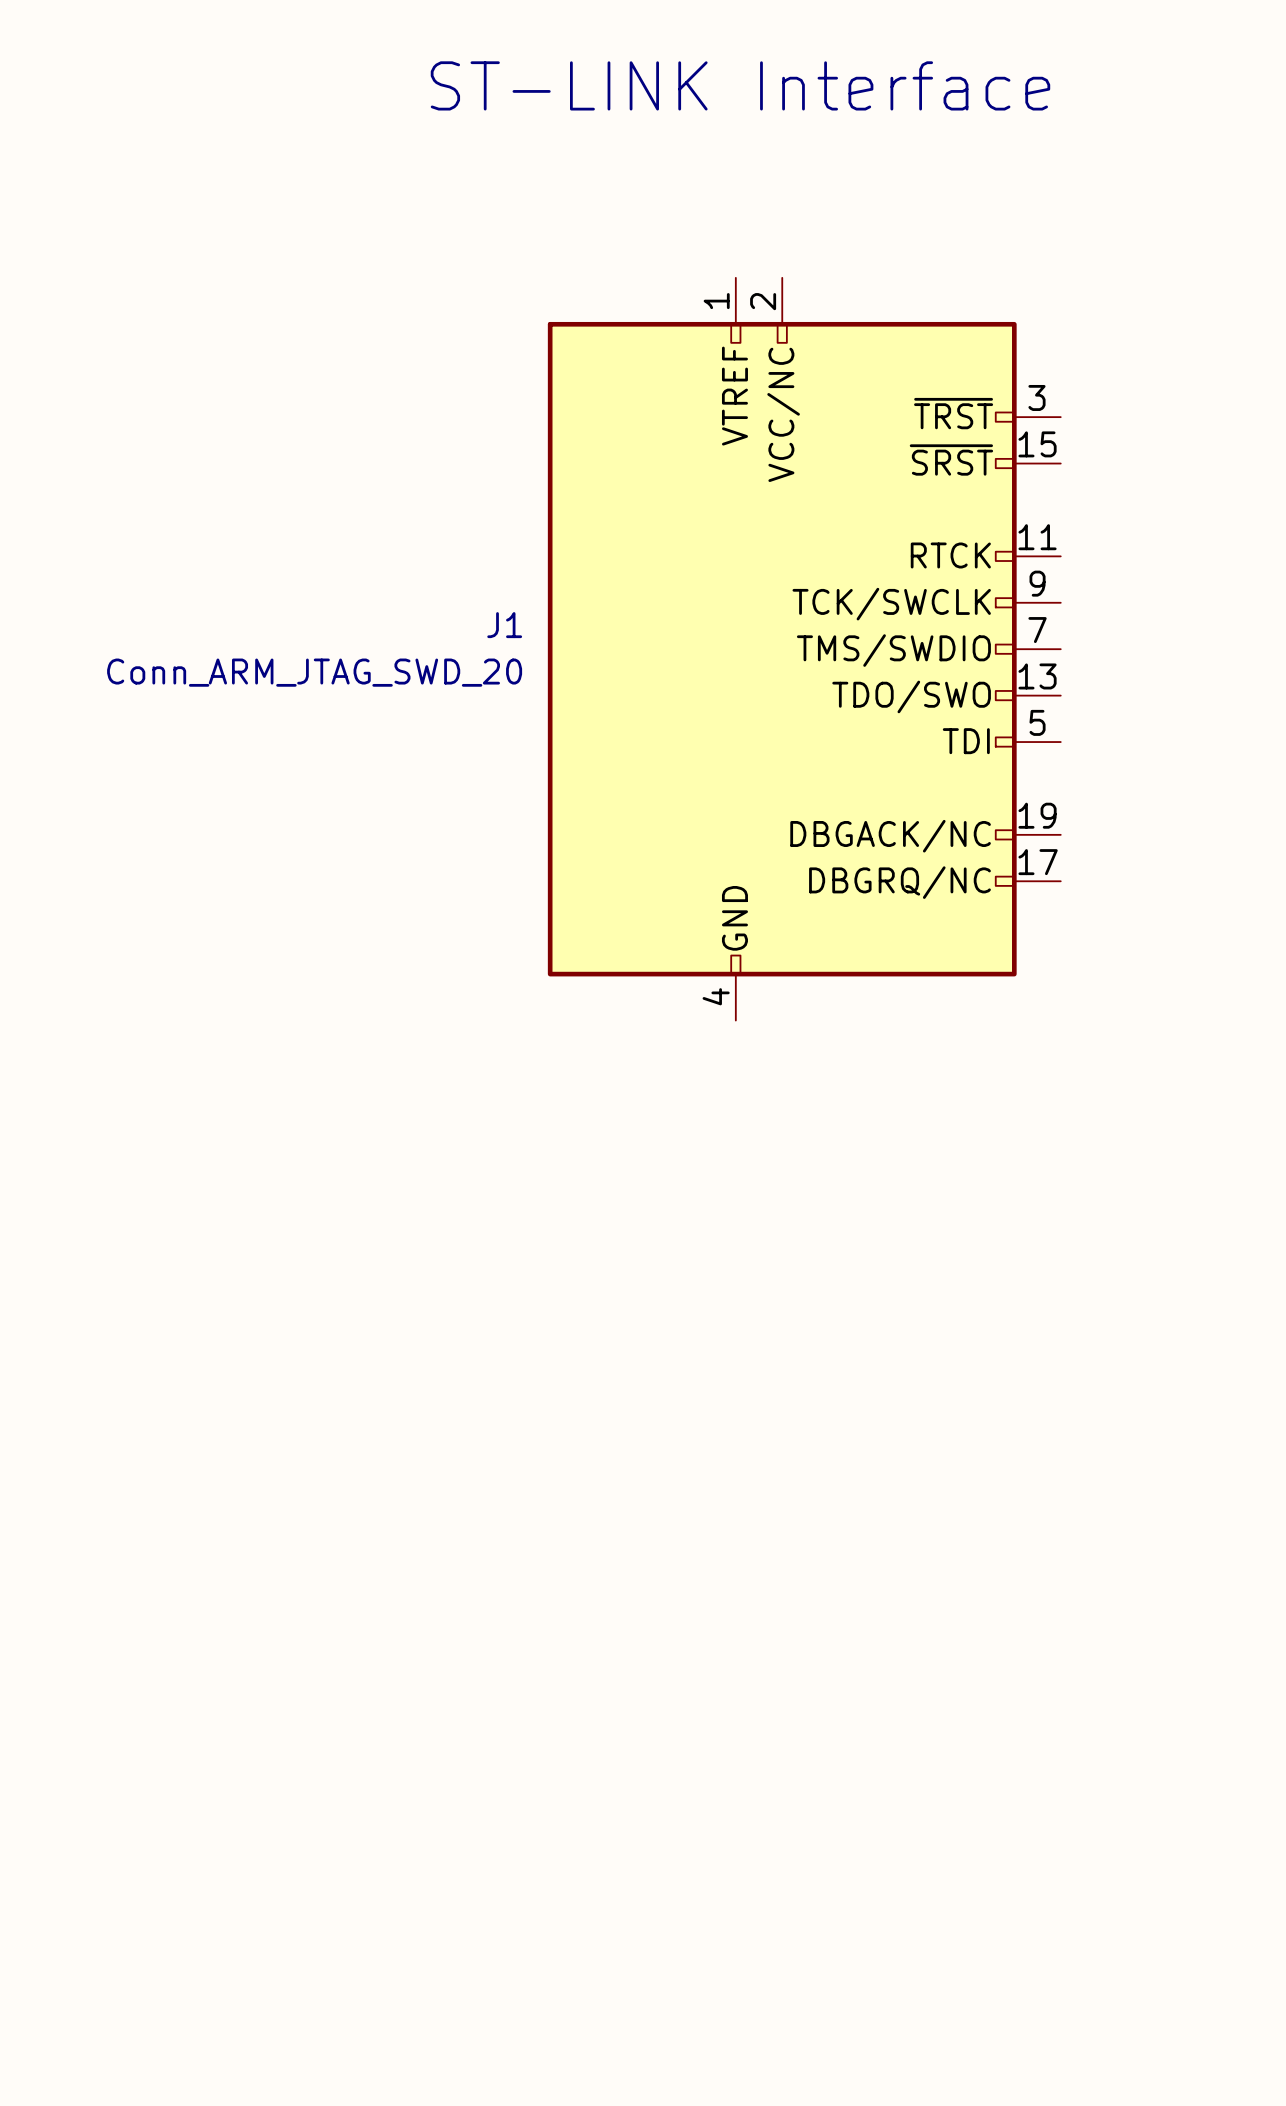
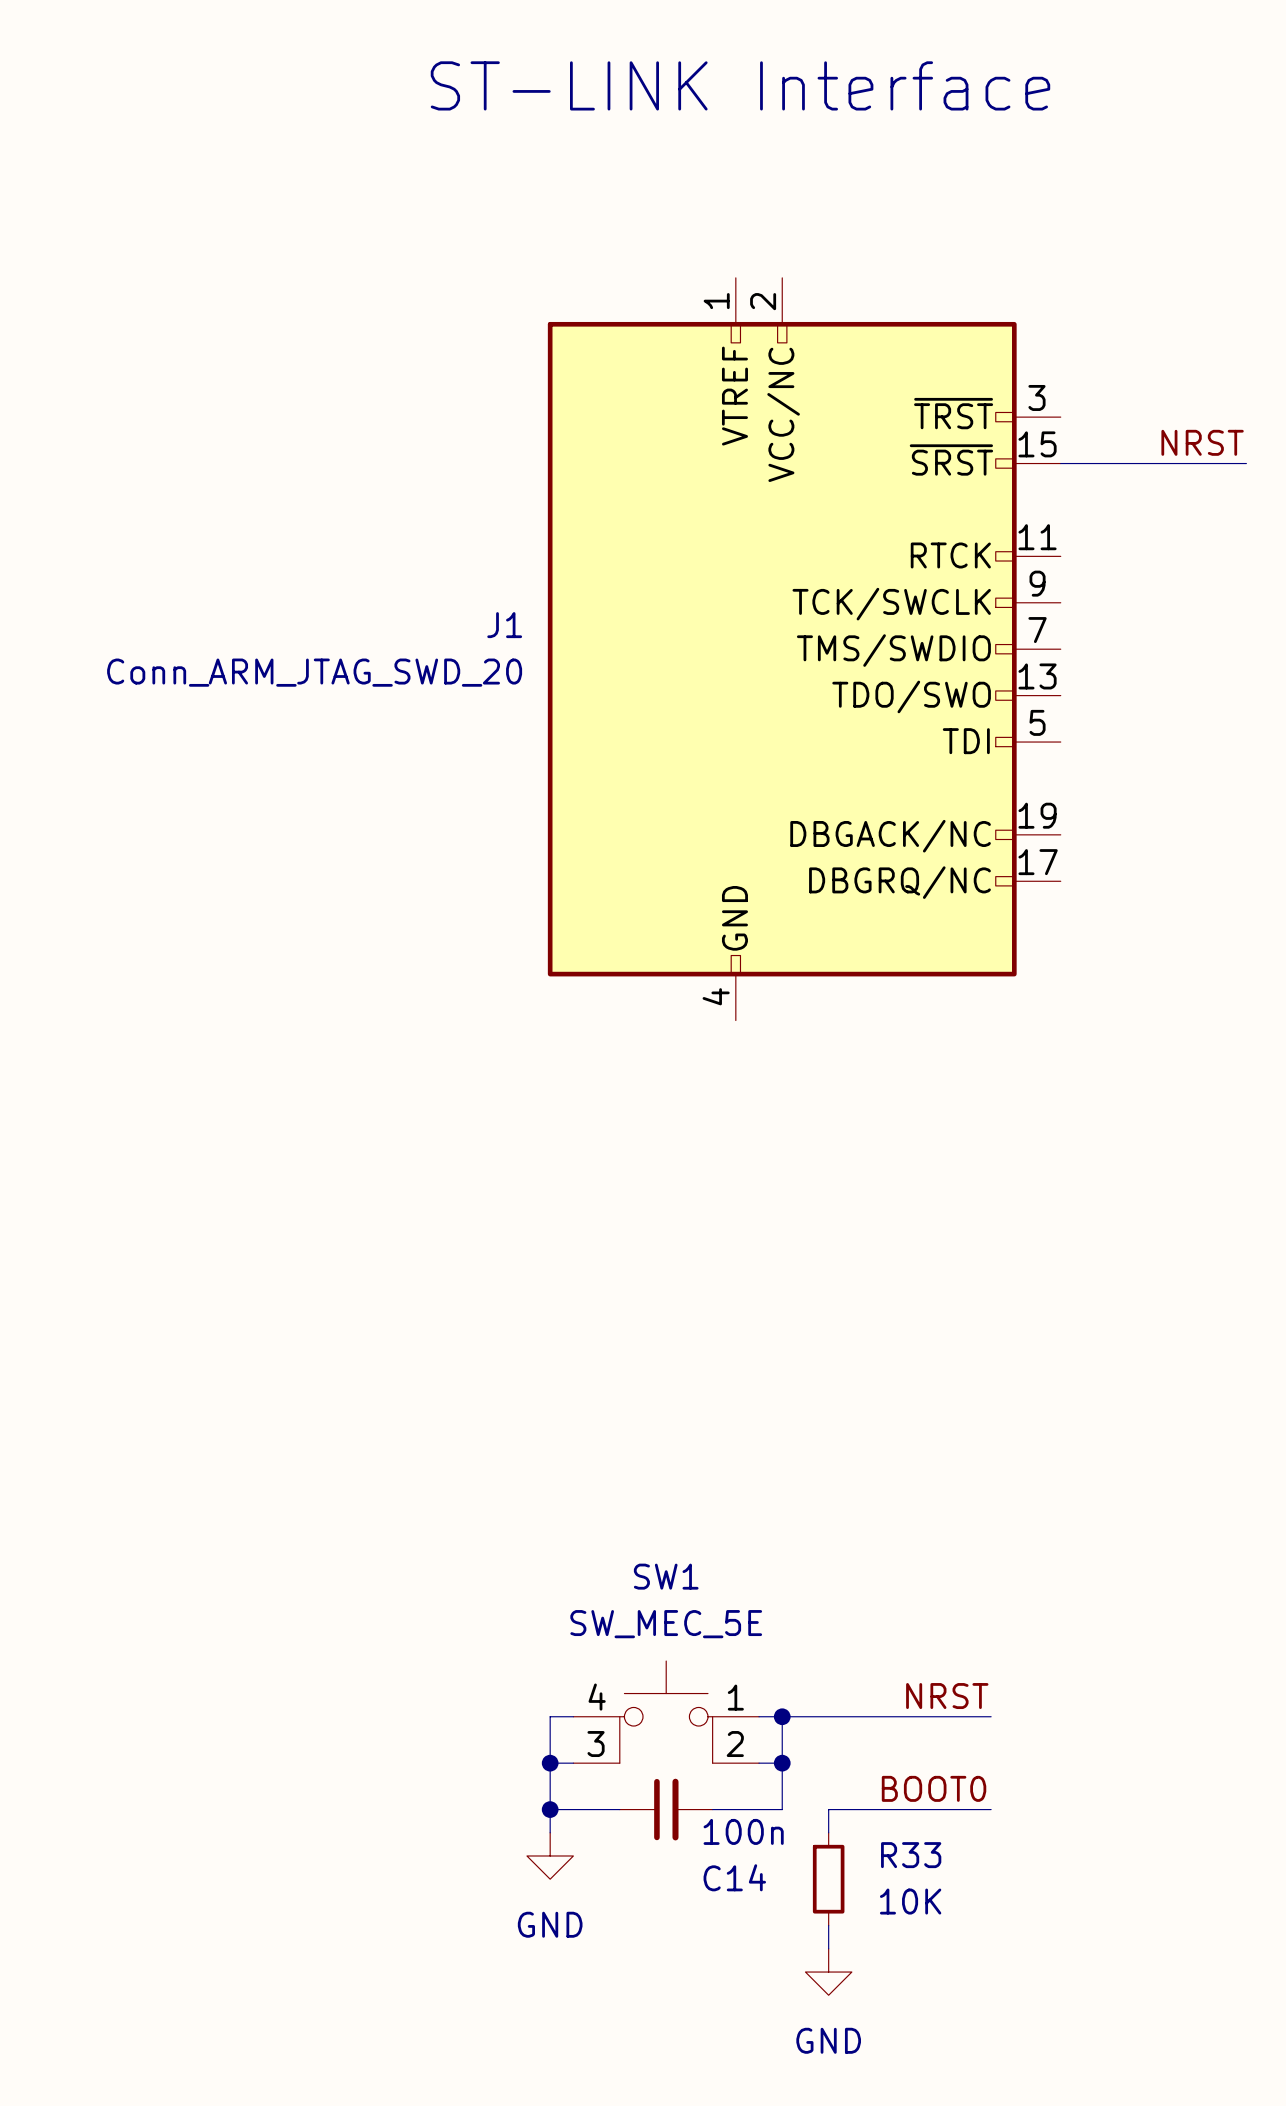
label: none -> NRST (1202, 442)
wire: none -> (1060, 463) (1246, 463)
label: none -> NRST (947, 1696)
SW1: none -> SW_MEC_5E (666, 1712)
wire: none -> (573, 1716) (550, 1716) (550, 1832)
wire: none -> (759, 1716) (991, 1716)
wire: none -> (782, 1716) (782, 1809) (712, 1809)
junction: none -> (782, 1716)
wire: none -> (550, 1763) (573, 1763)
junction: none -> (550, 1763)
wire: none -> (759, 1763) (782, 1763)
junction: none -> (782, 1763)
label: none -> BOOT0 (934, 1788)
wire: none -> (550, 1809) (619, 1809)
junction: none -> (550, 1809)
C14: none -> 100n (666, 1809)
wire: none -> (991, 1809) (828, 1809) (828, 1832)
power symbol: none -> GND (550, 1855)
R33: none -> 10K (828, 1879)
wire: none -> (828, 1925) (828, 1948)
power symbol: none -> GND (828, 1972)

